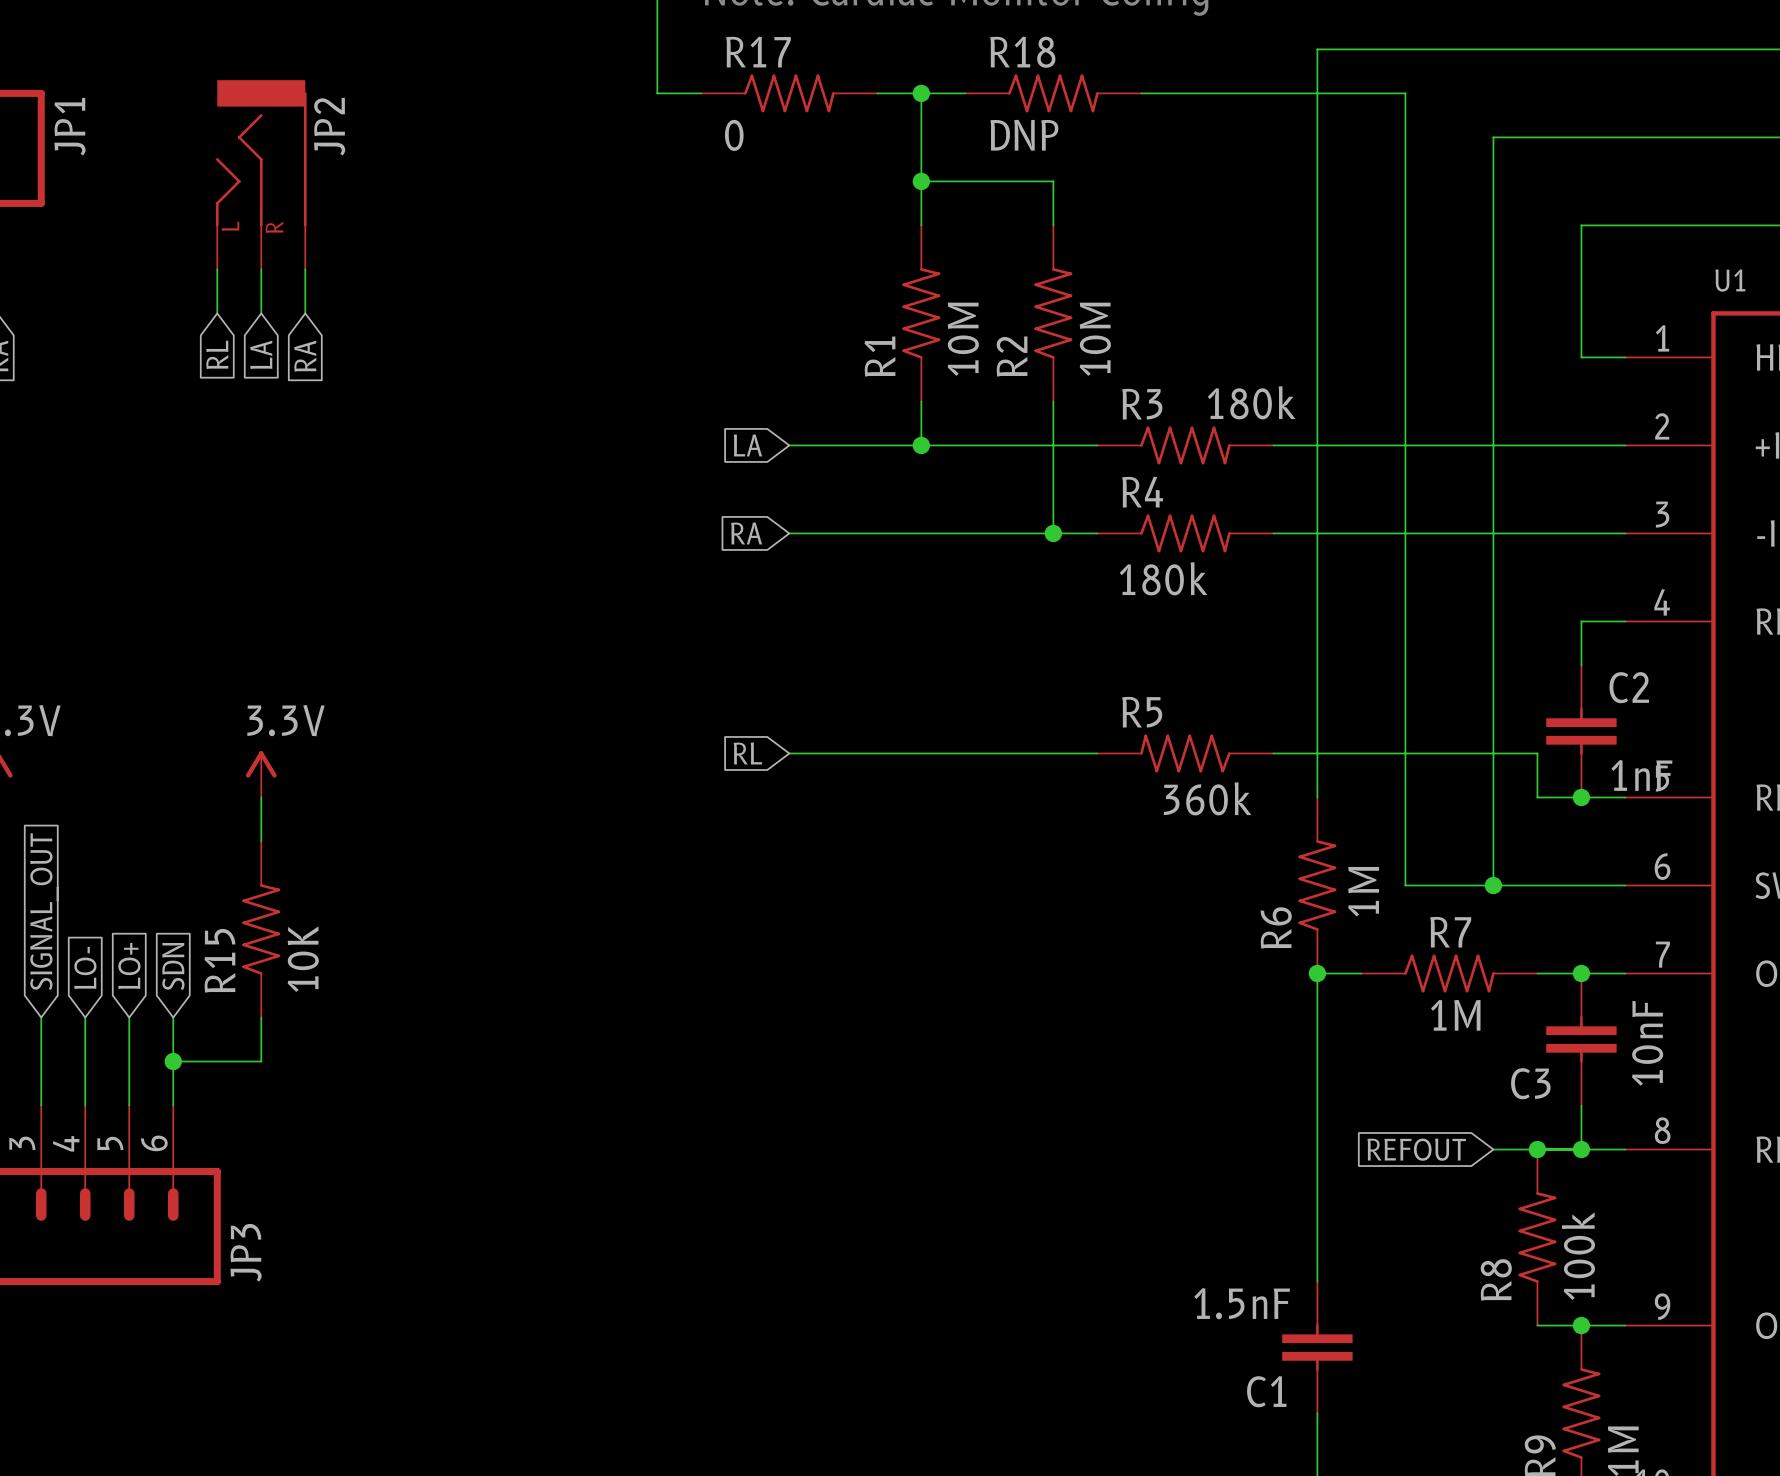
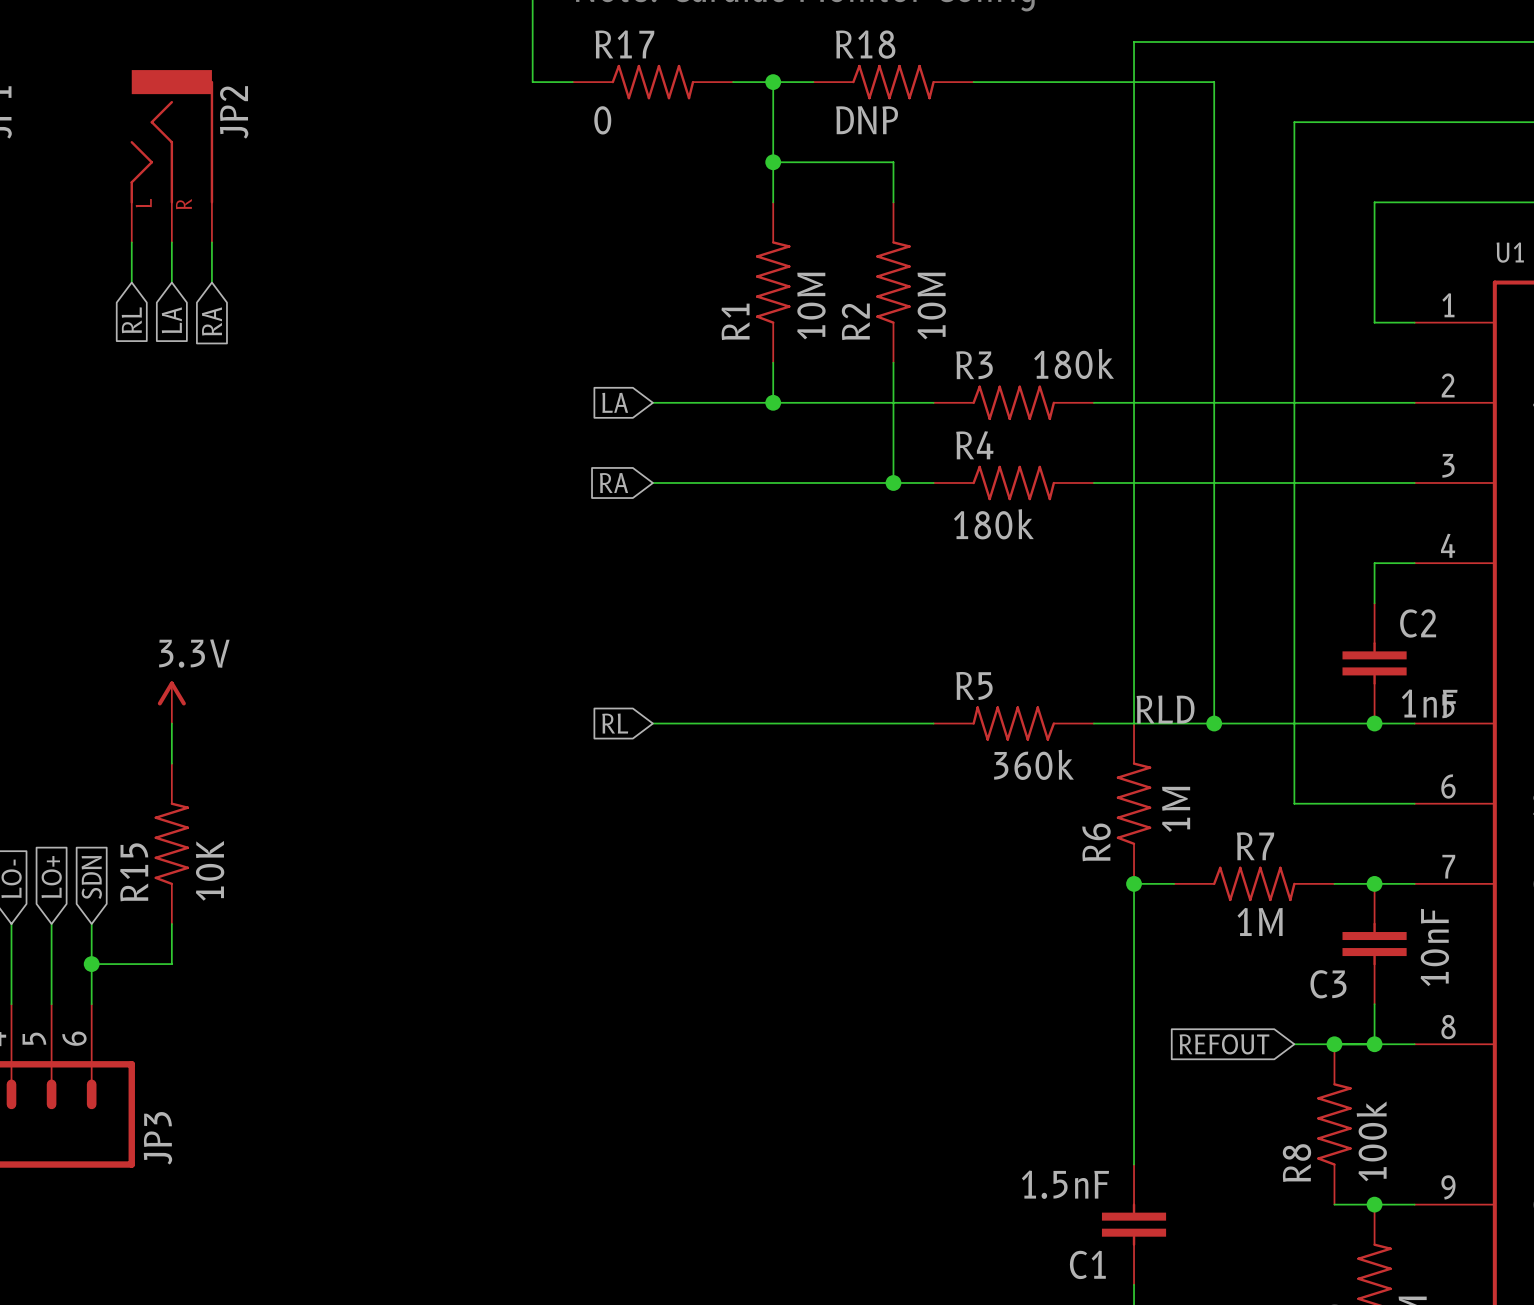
global label position: RL (747, 753) -> RL (615, 723)
wire: (789, 753) (1097, 753) -> (652, 723) (933, 723)
R5 position: (1185, 753) -> (1013, 723)
wire: (1273, 753) (1537, 753) (1537, 797) -> (1093, 723) (1334, 723)
label: none -> RLD (1165, 709)
wire: (1405, 797) (1405, 885) (1493, 885) -> none
junction: none -> (1214, 723)
junction: (1493, 885) -> none

